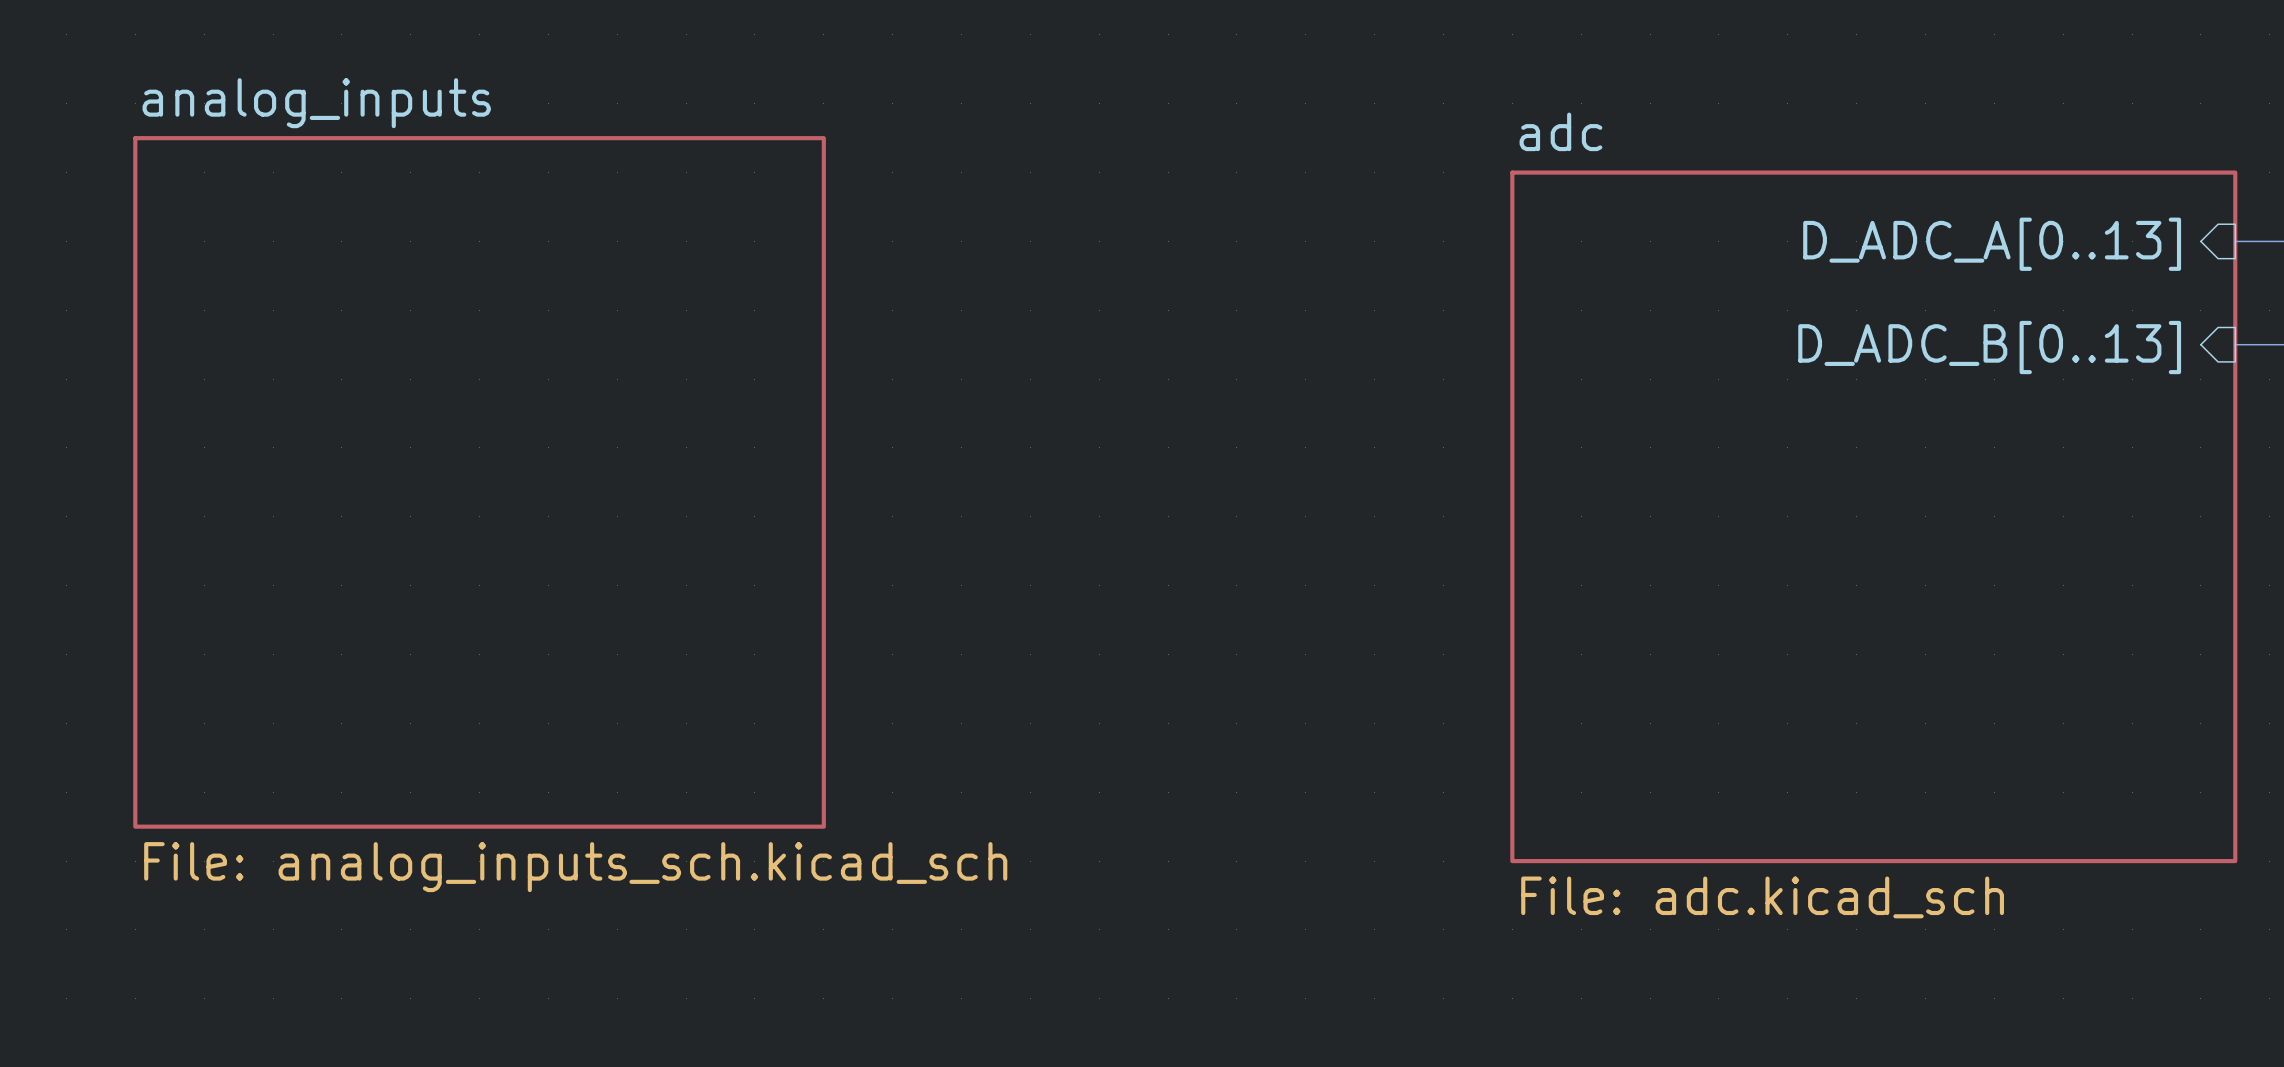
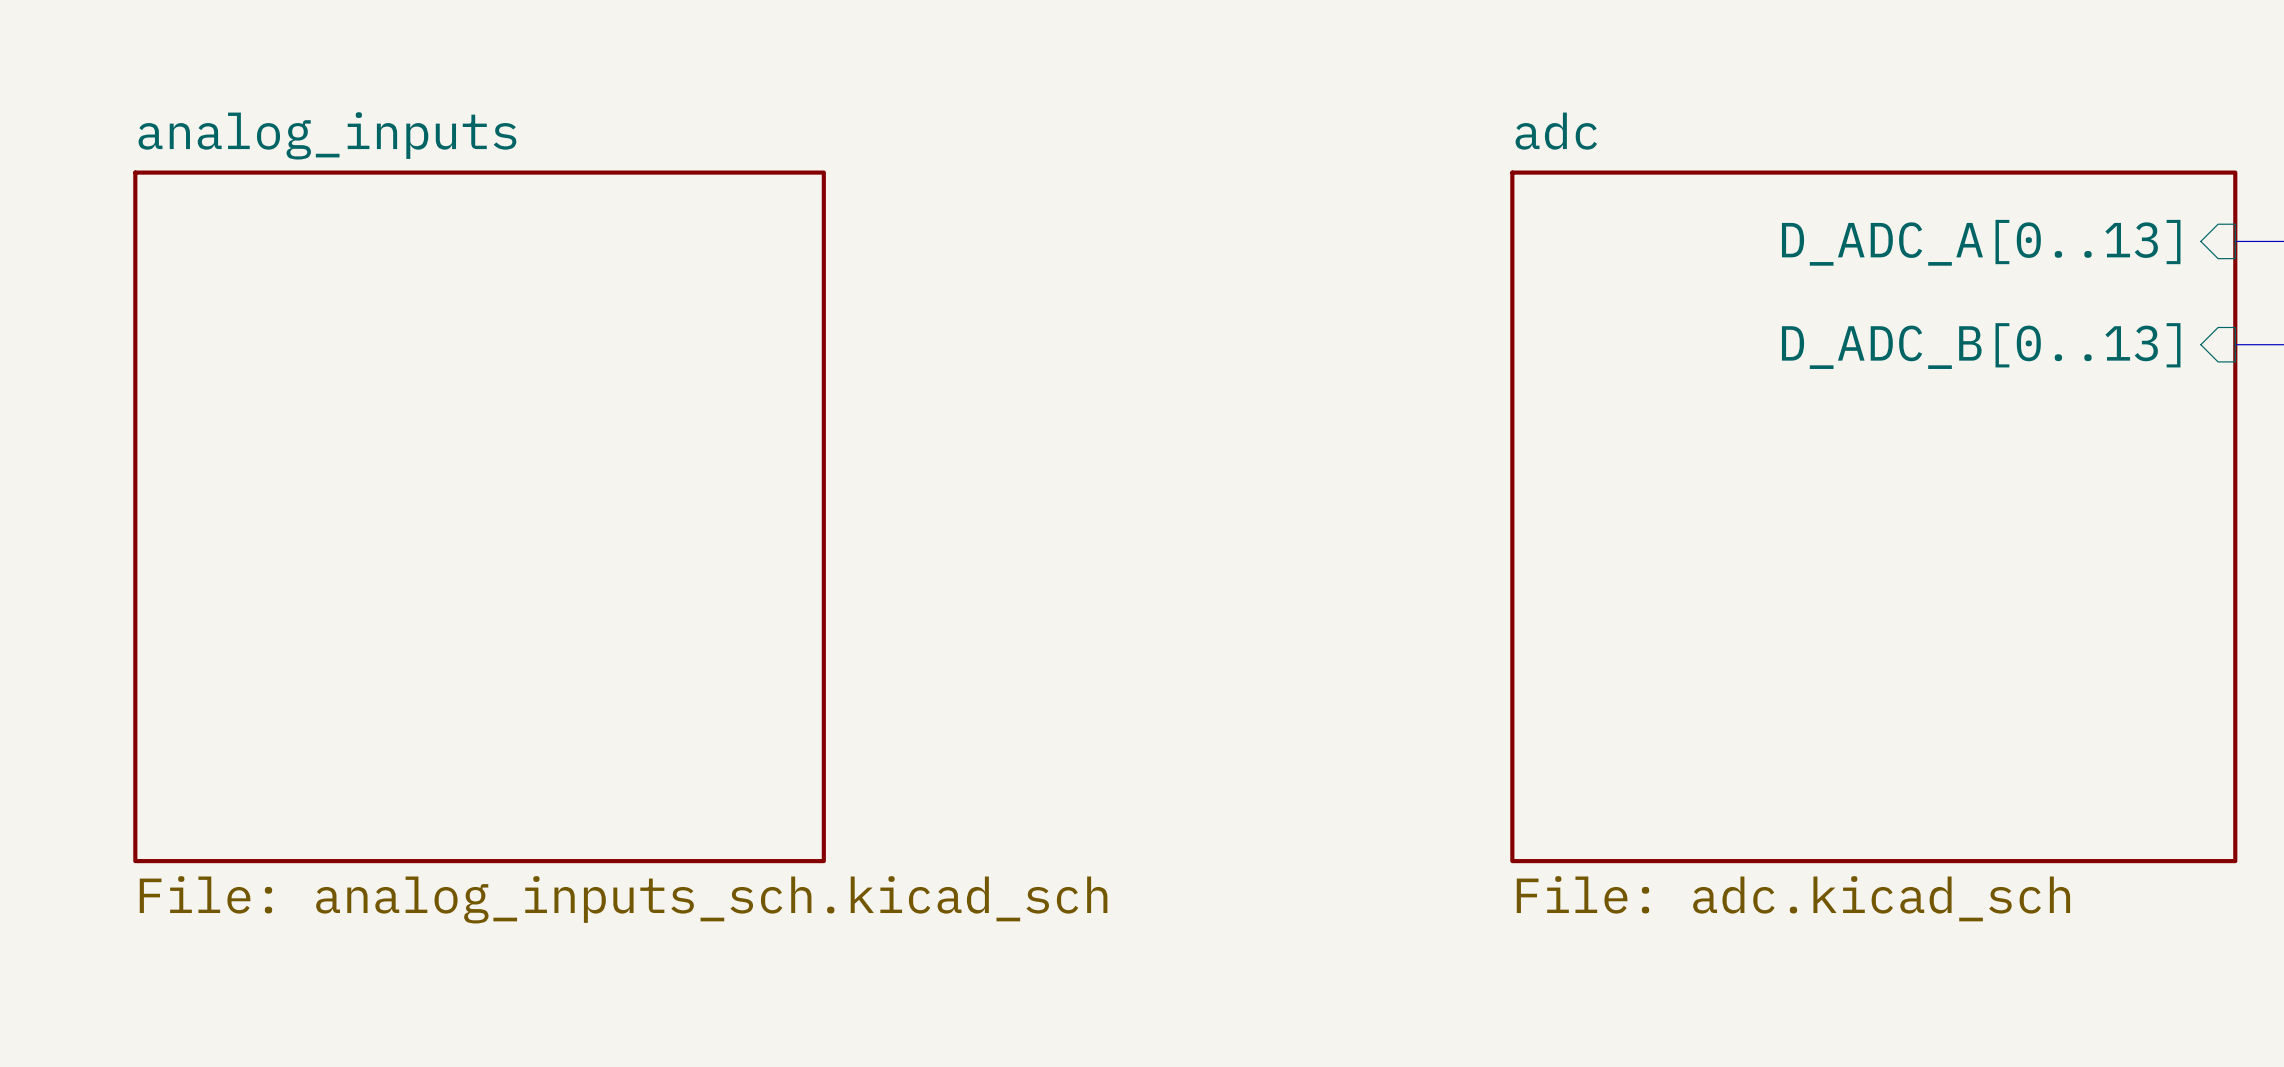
sheet analog_inputs position: (479, 482) -> (479, 516)

